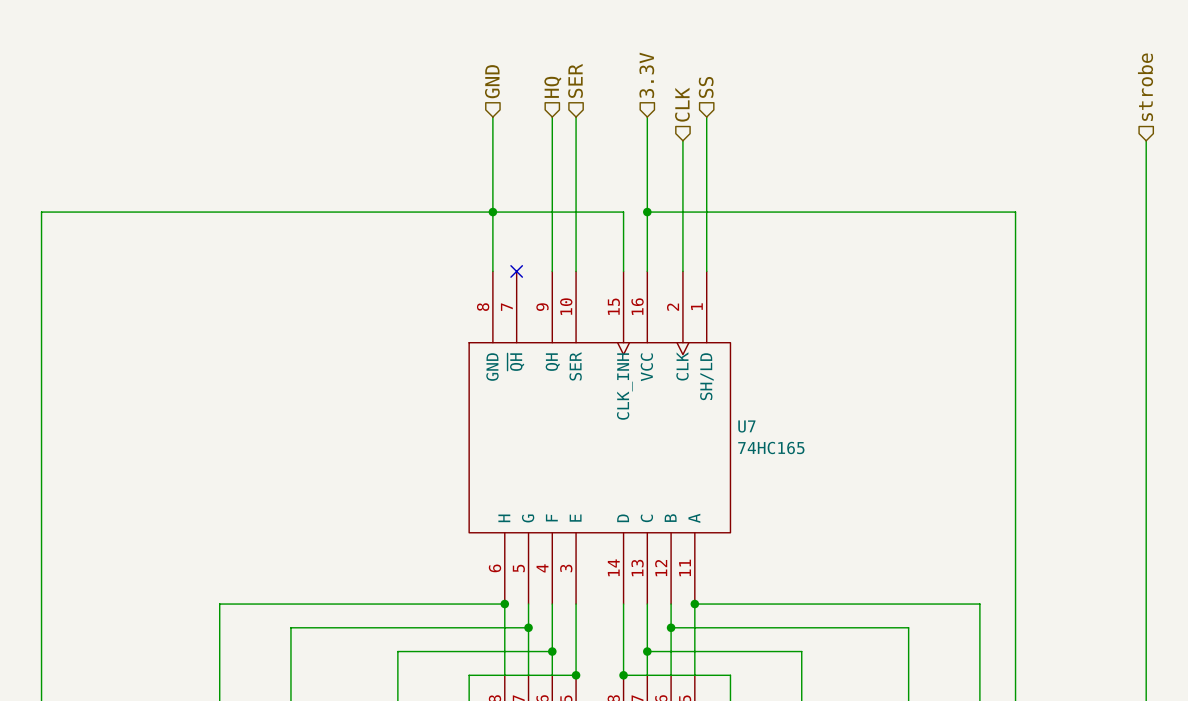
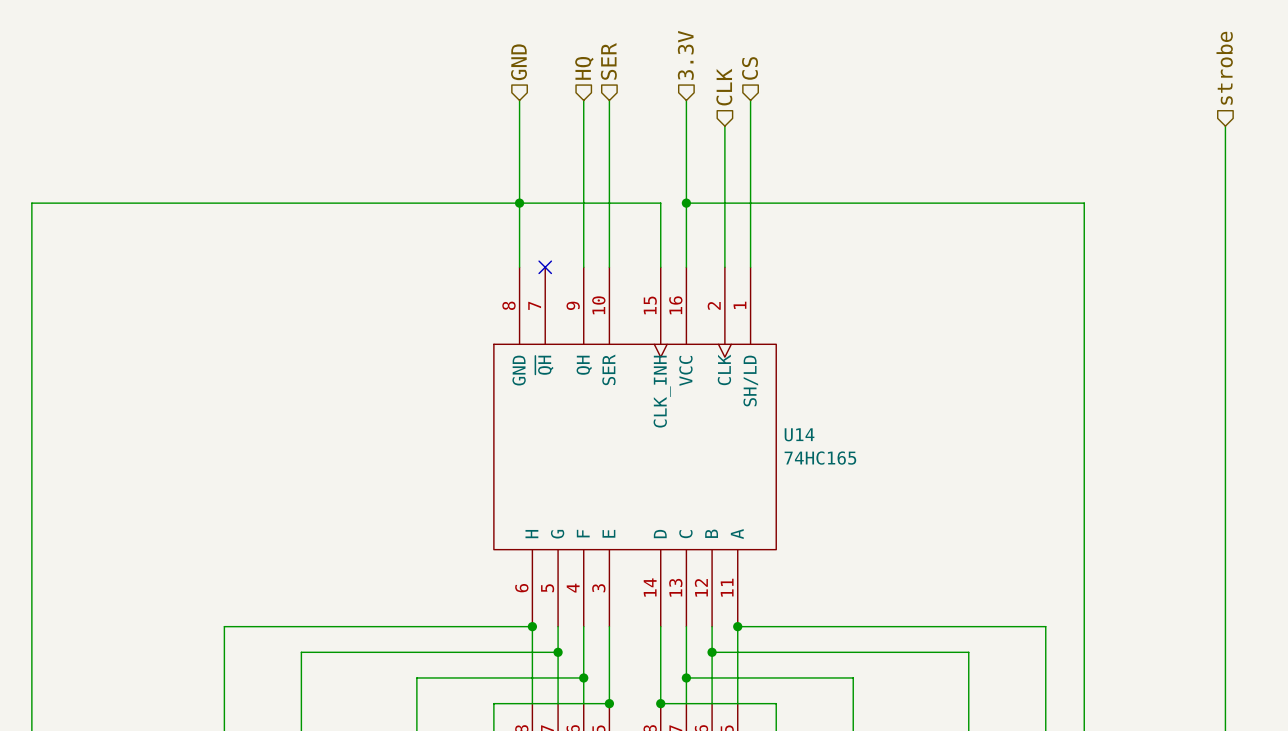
hierarchical label: SS (706, 87) -> CS (750, 68)
U7 name: U7 (746, 426) -> U14 (799, 434)

